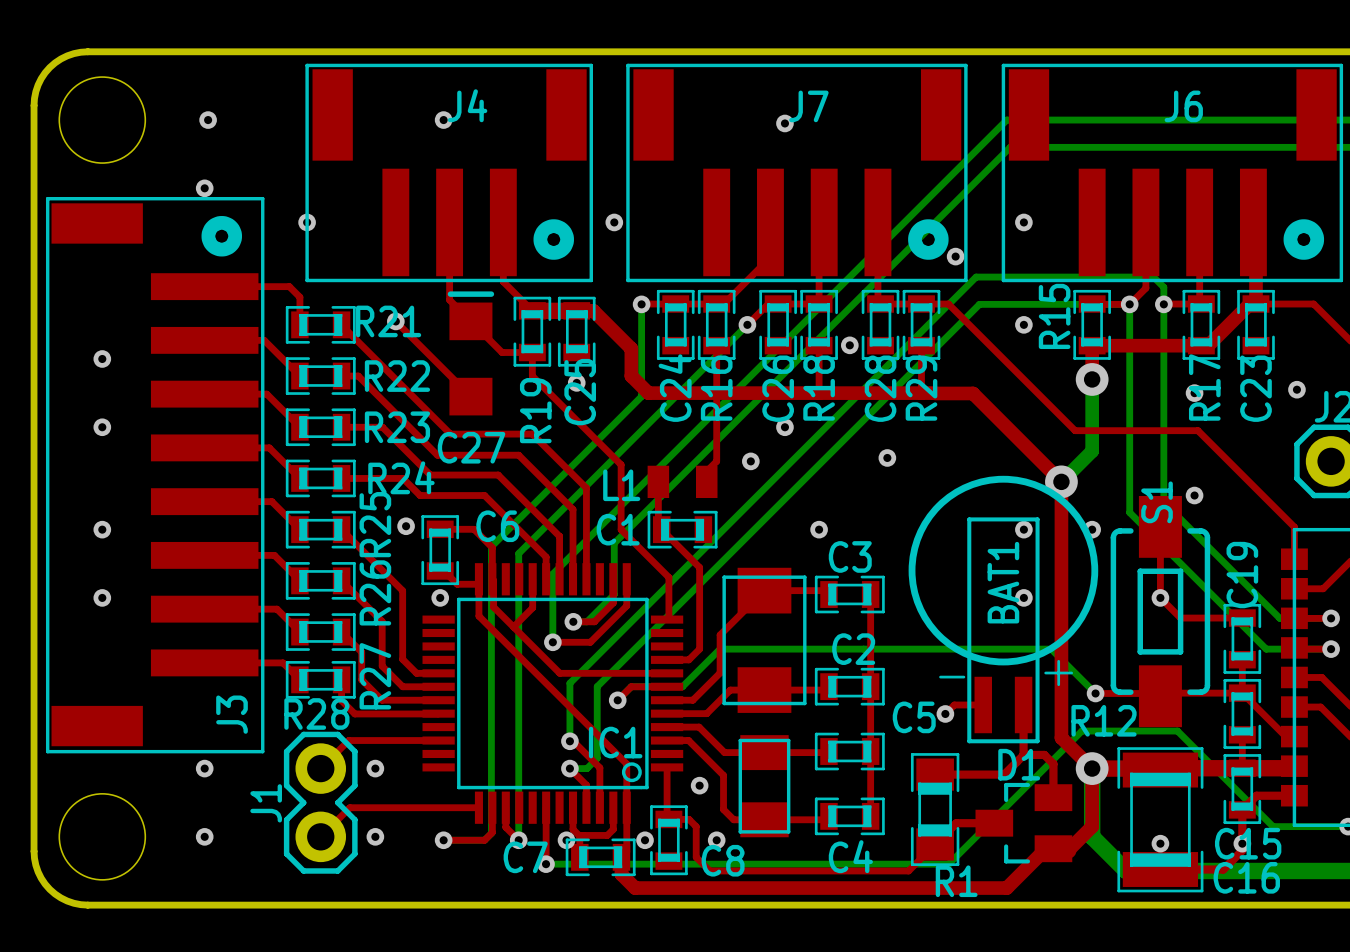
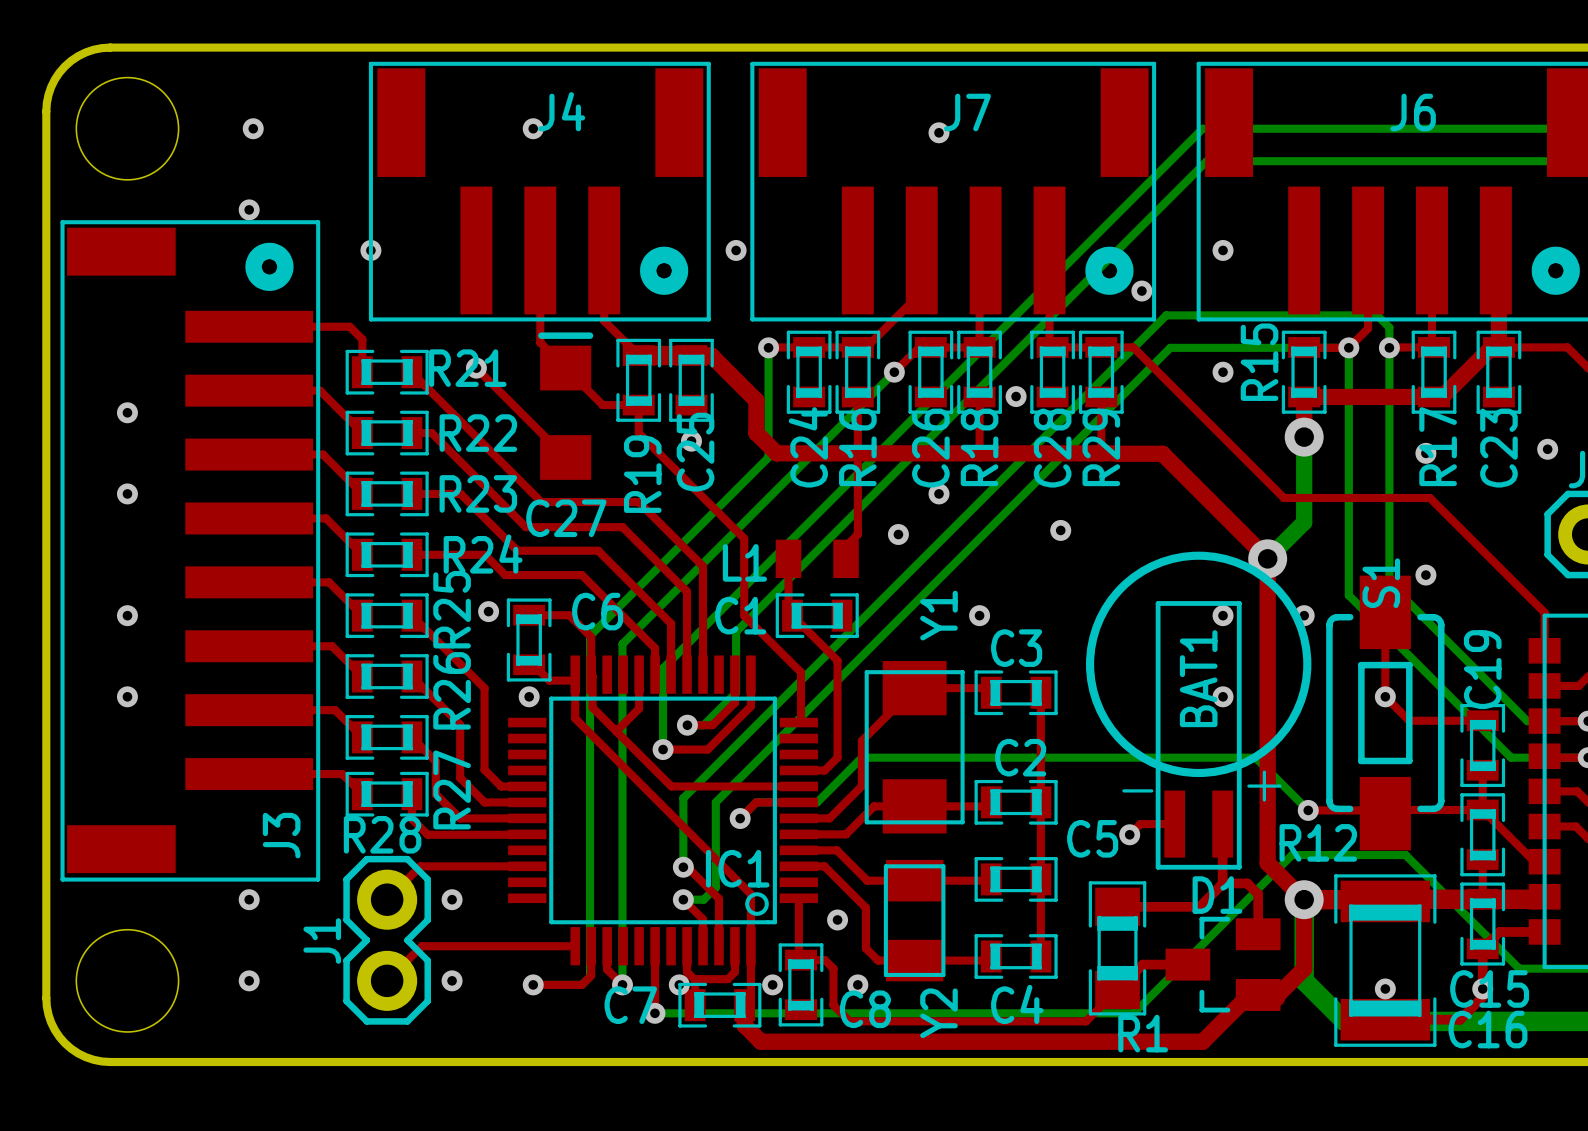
Y1 name: none -> Y1 (939, 615)
Y2 name: none -> Y2 (939, 1013)

